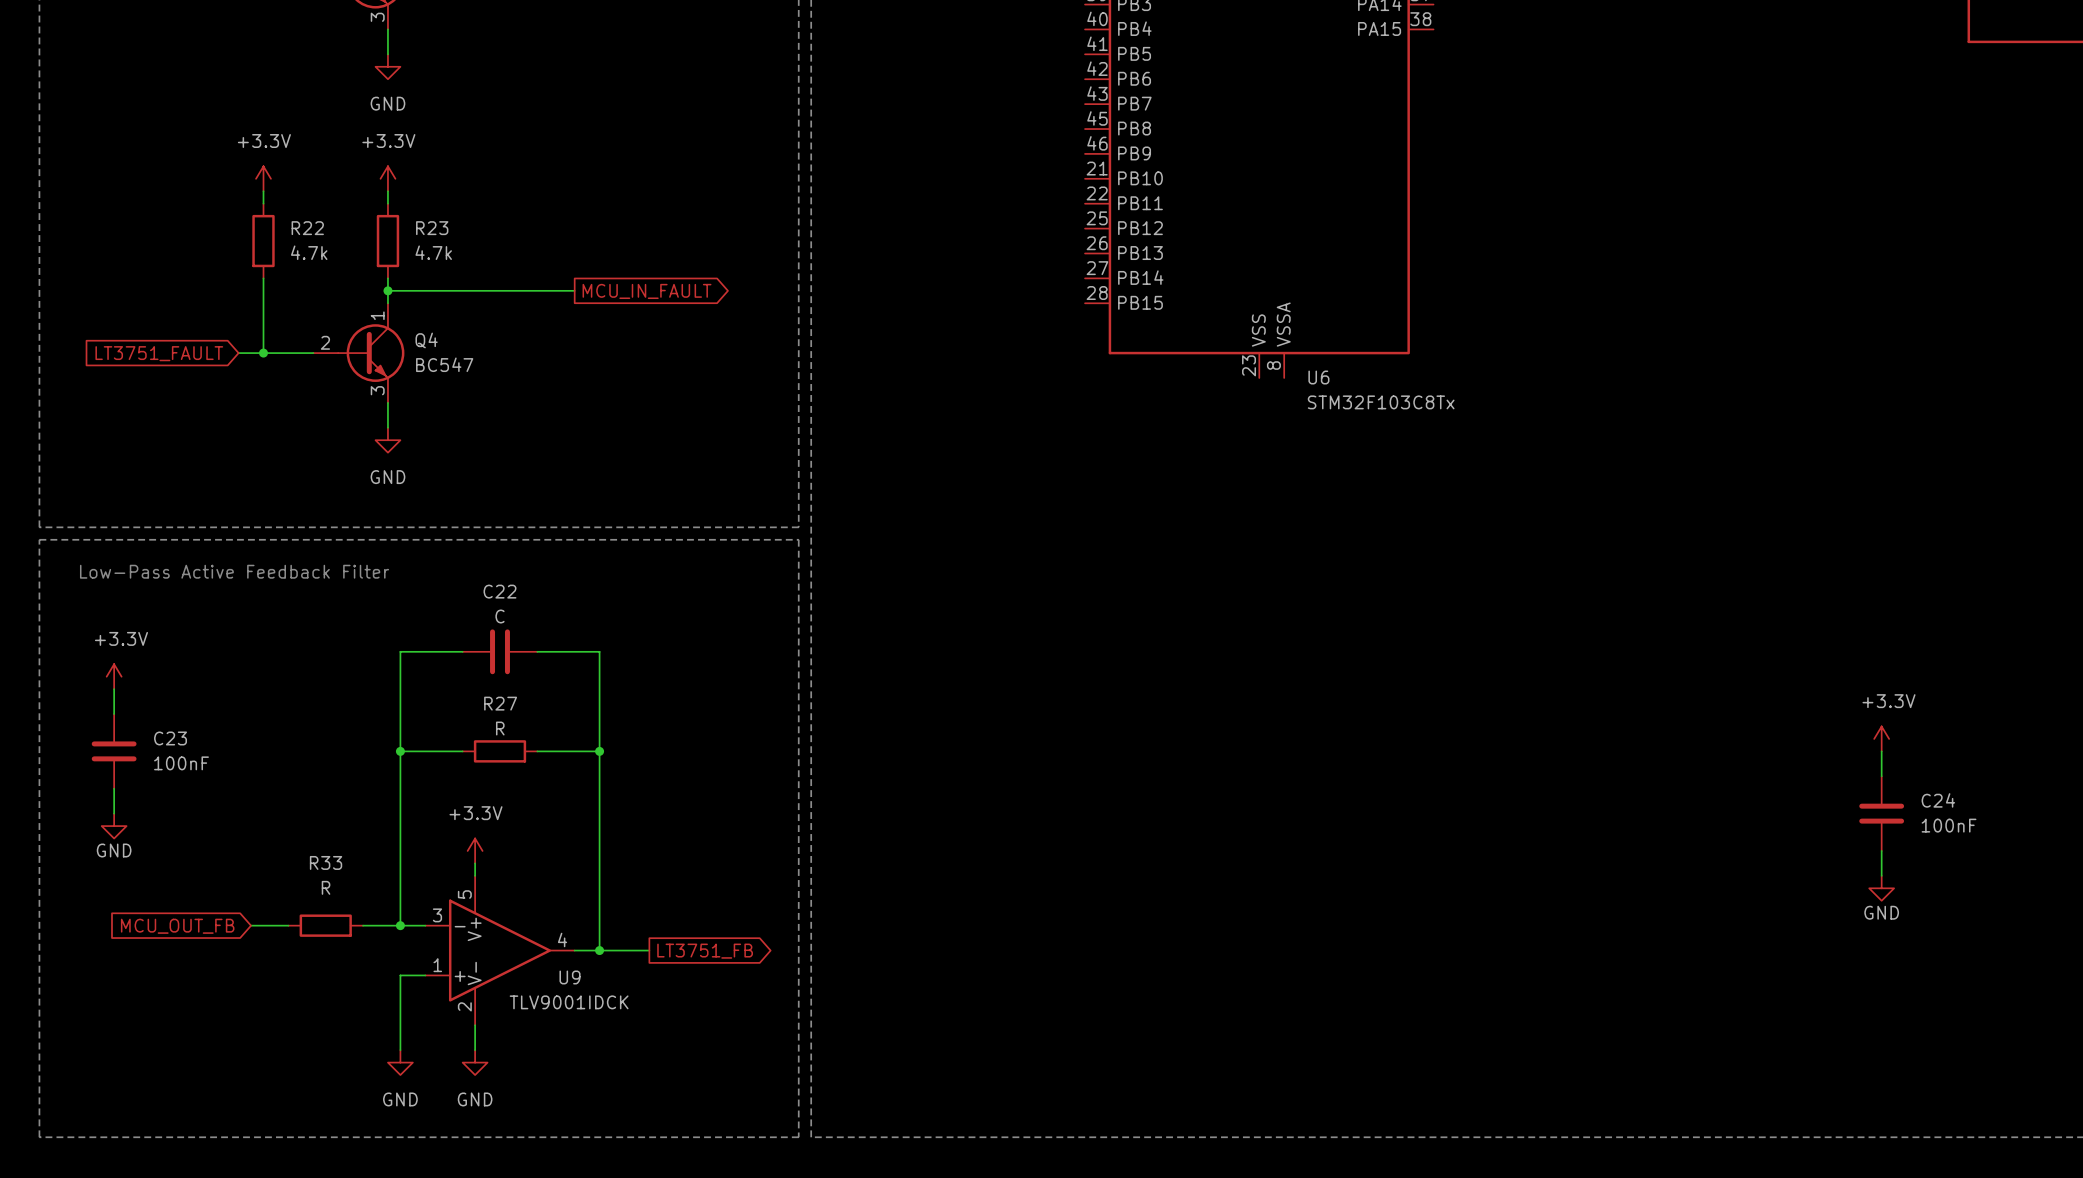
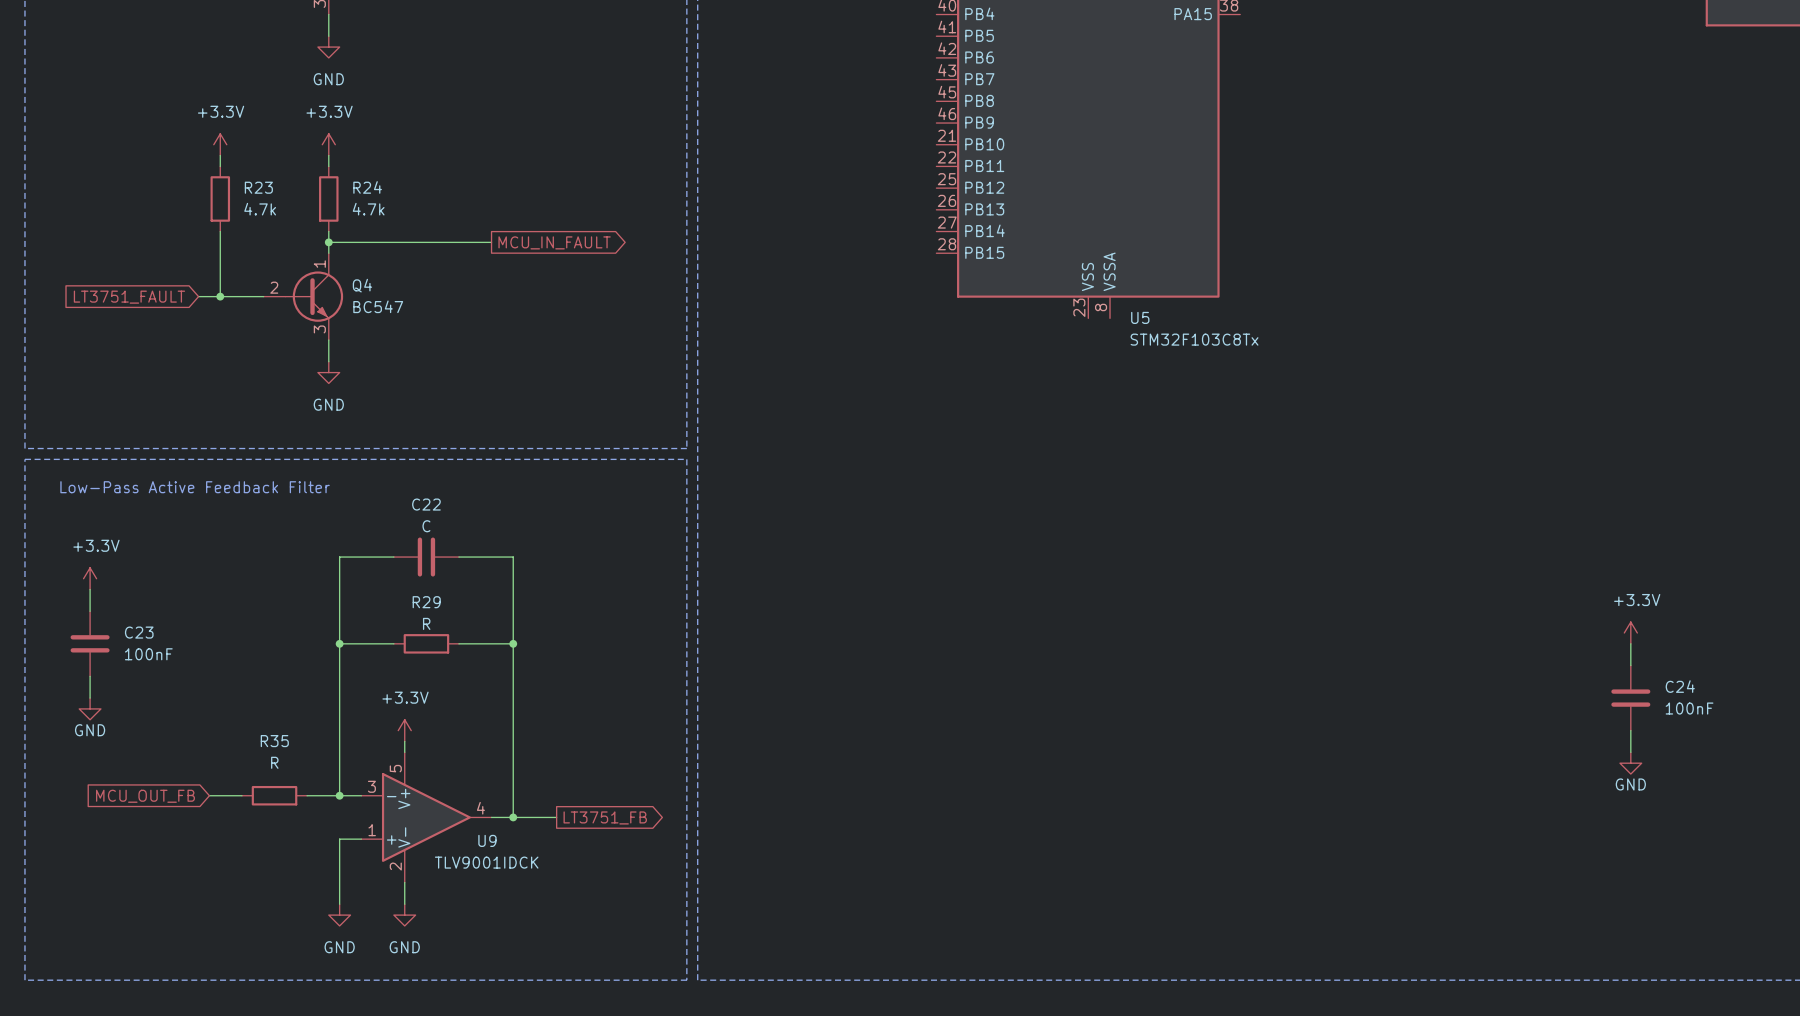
R22 name: R22 (307, 228) -> R23 (258, 187)
R23 name: R23 (432, 228) -> R24 (367, 187)
U6 name: U6 (1318, 377) -> U5 (1140, 317)
R27 name: R27 (500, 703) -> R29 (426, 602)
R33 name: R33 (326, 862) -> R35 (274, 741)

